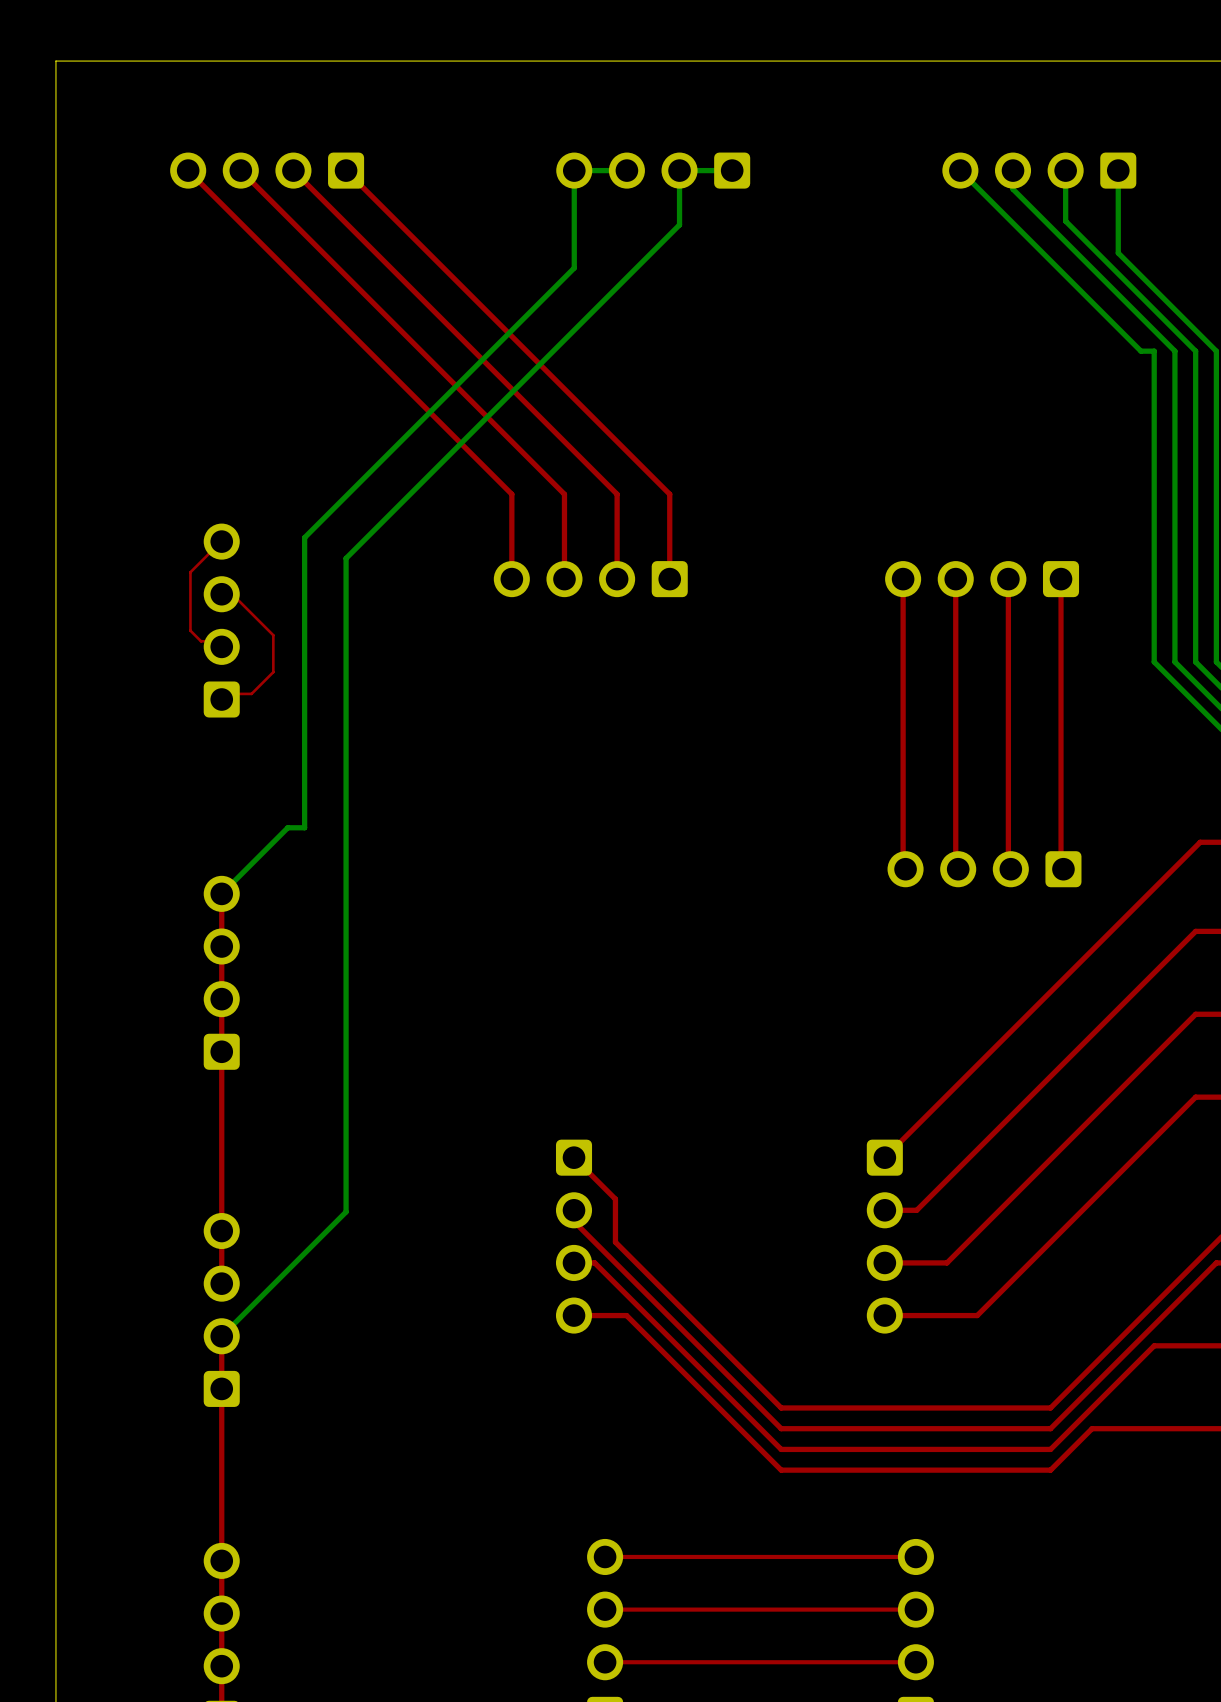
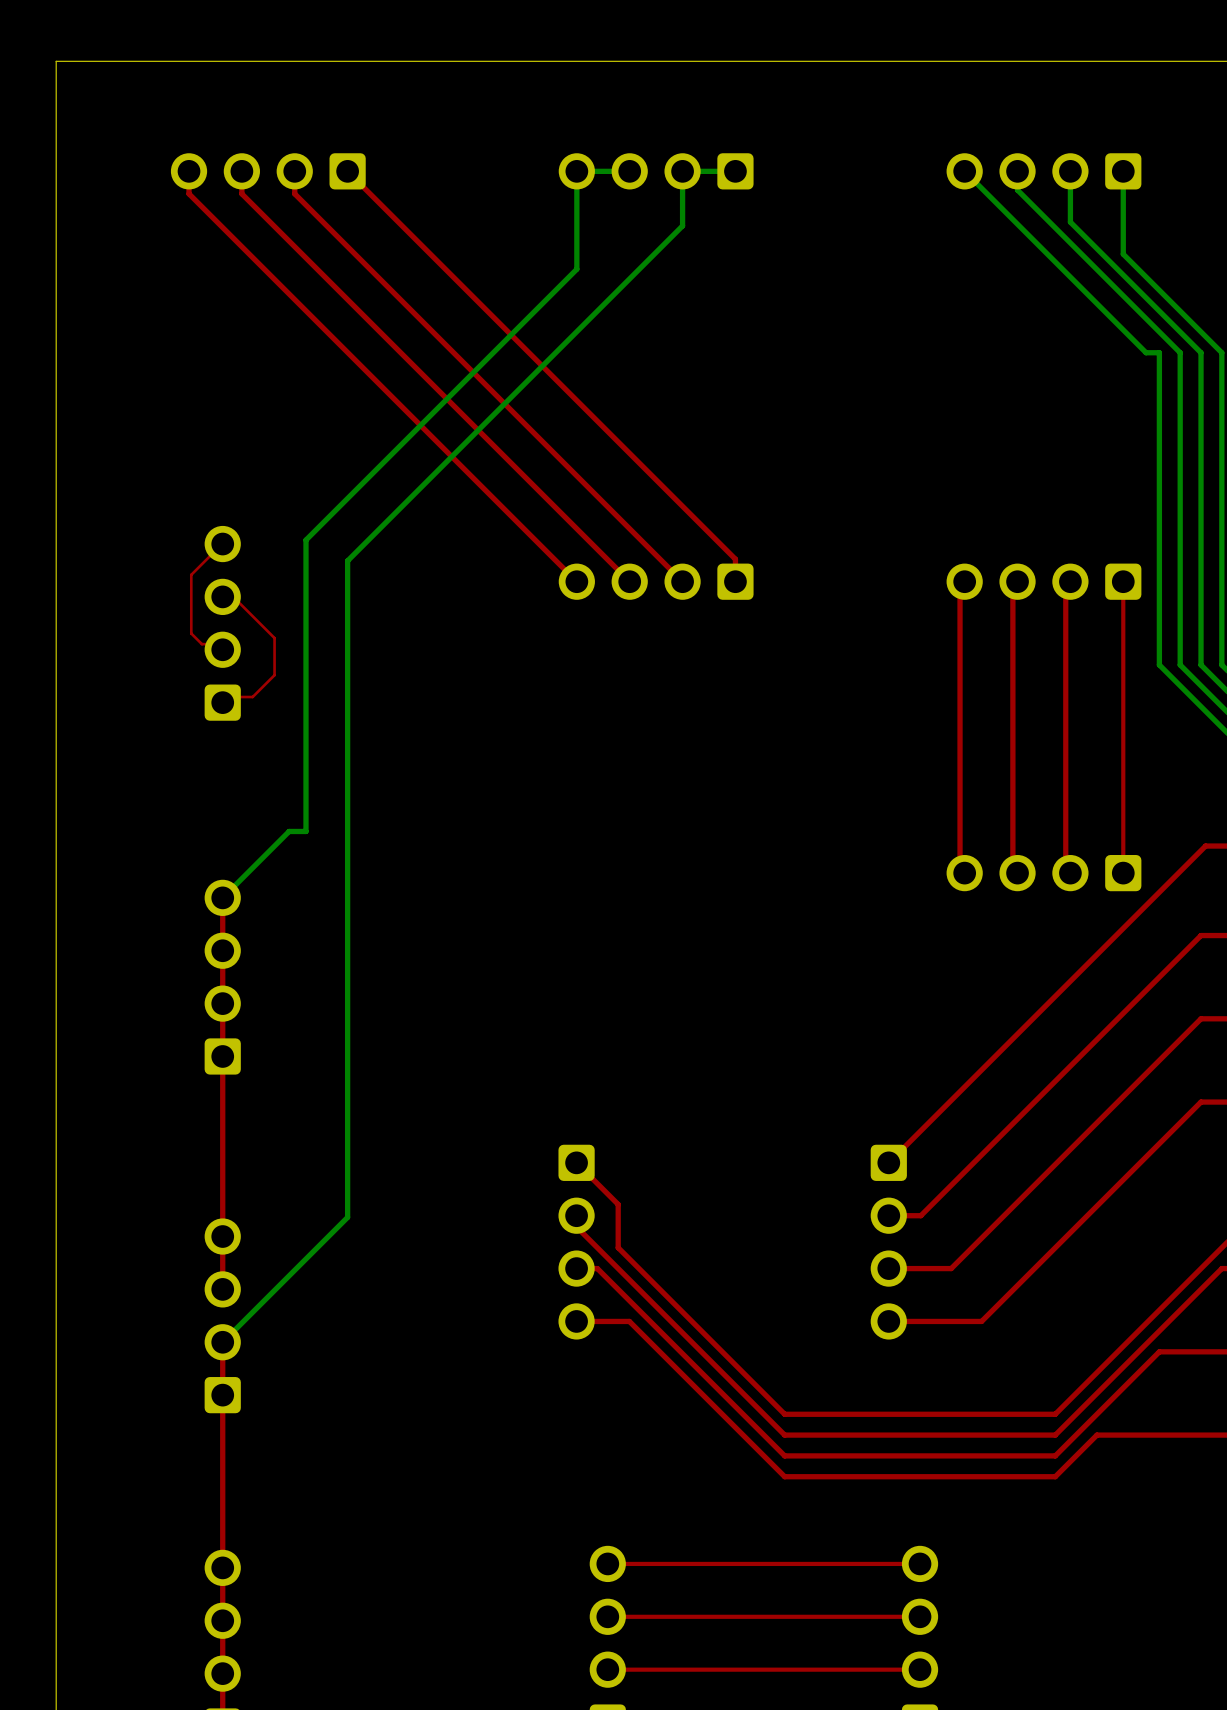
top track: (188, 170) (511, 494) (511, 579) -> (189, 171) (189, 193) (576, 581)
top track: (240, 170) (564, 494) (564, 579) -> (241, 171) (241, 193) (629, 581)
top track: (293, 170) (617, 494) (617, 579) -> (294, 171) (294, 193) (682, 581)
top track: (669, 494) (669, 579) -> (672, 496) (735, 559) (735, 581)
part position: (590, 579) -> (656, 581)
top track: (903, 579) (903, 871) (905, 874) -> none
part position: (982, 579) -> (1043, 581)
top track: none -> (1123, 581) (1123, 873)
part position: (984, 869) -> (1043, 873)

